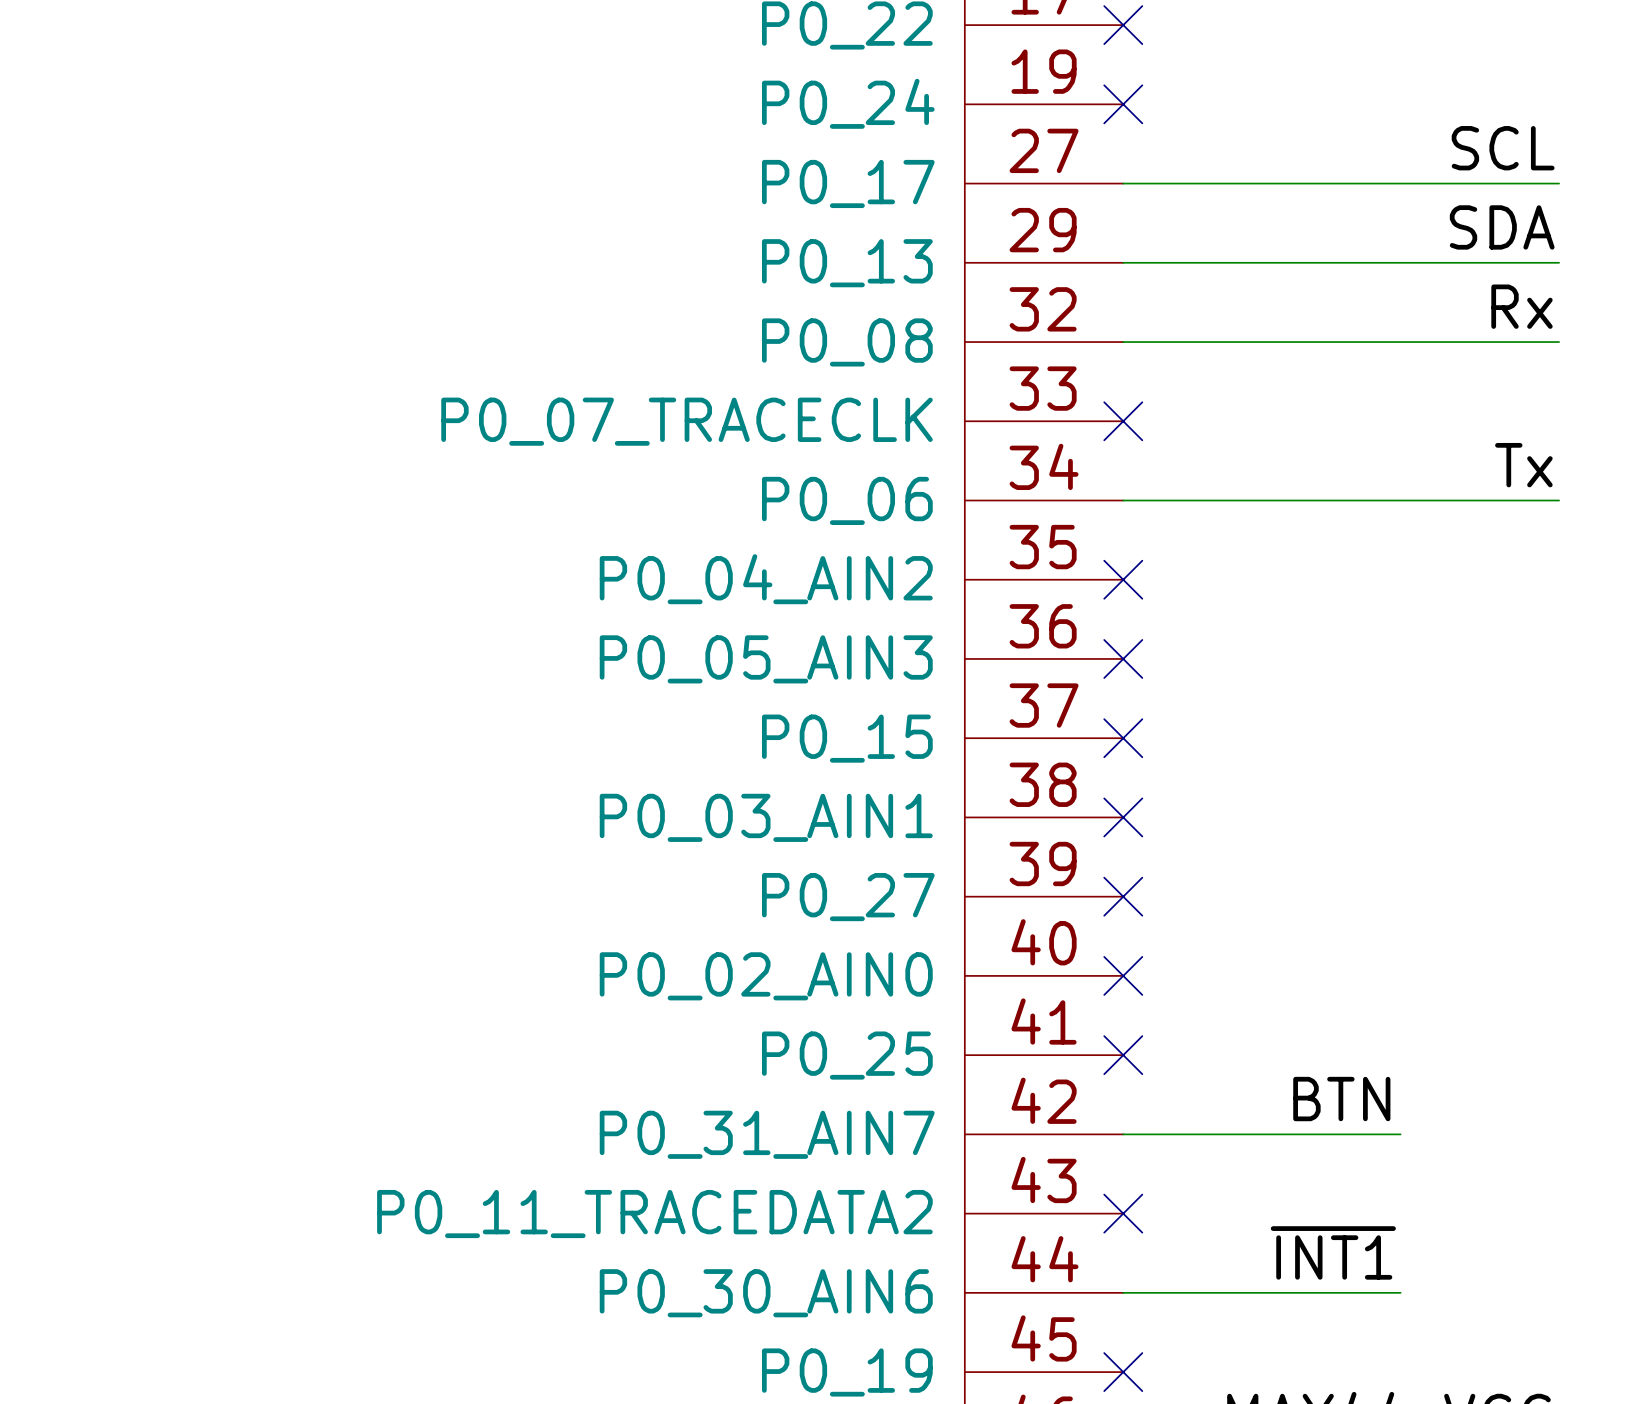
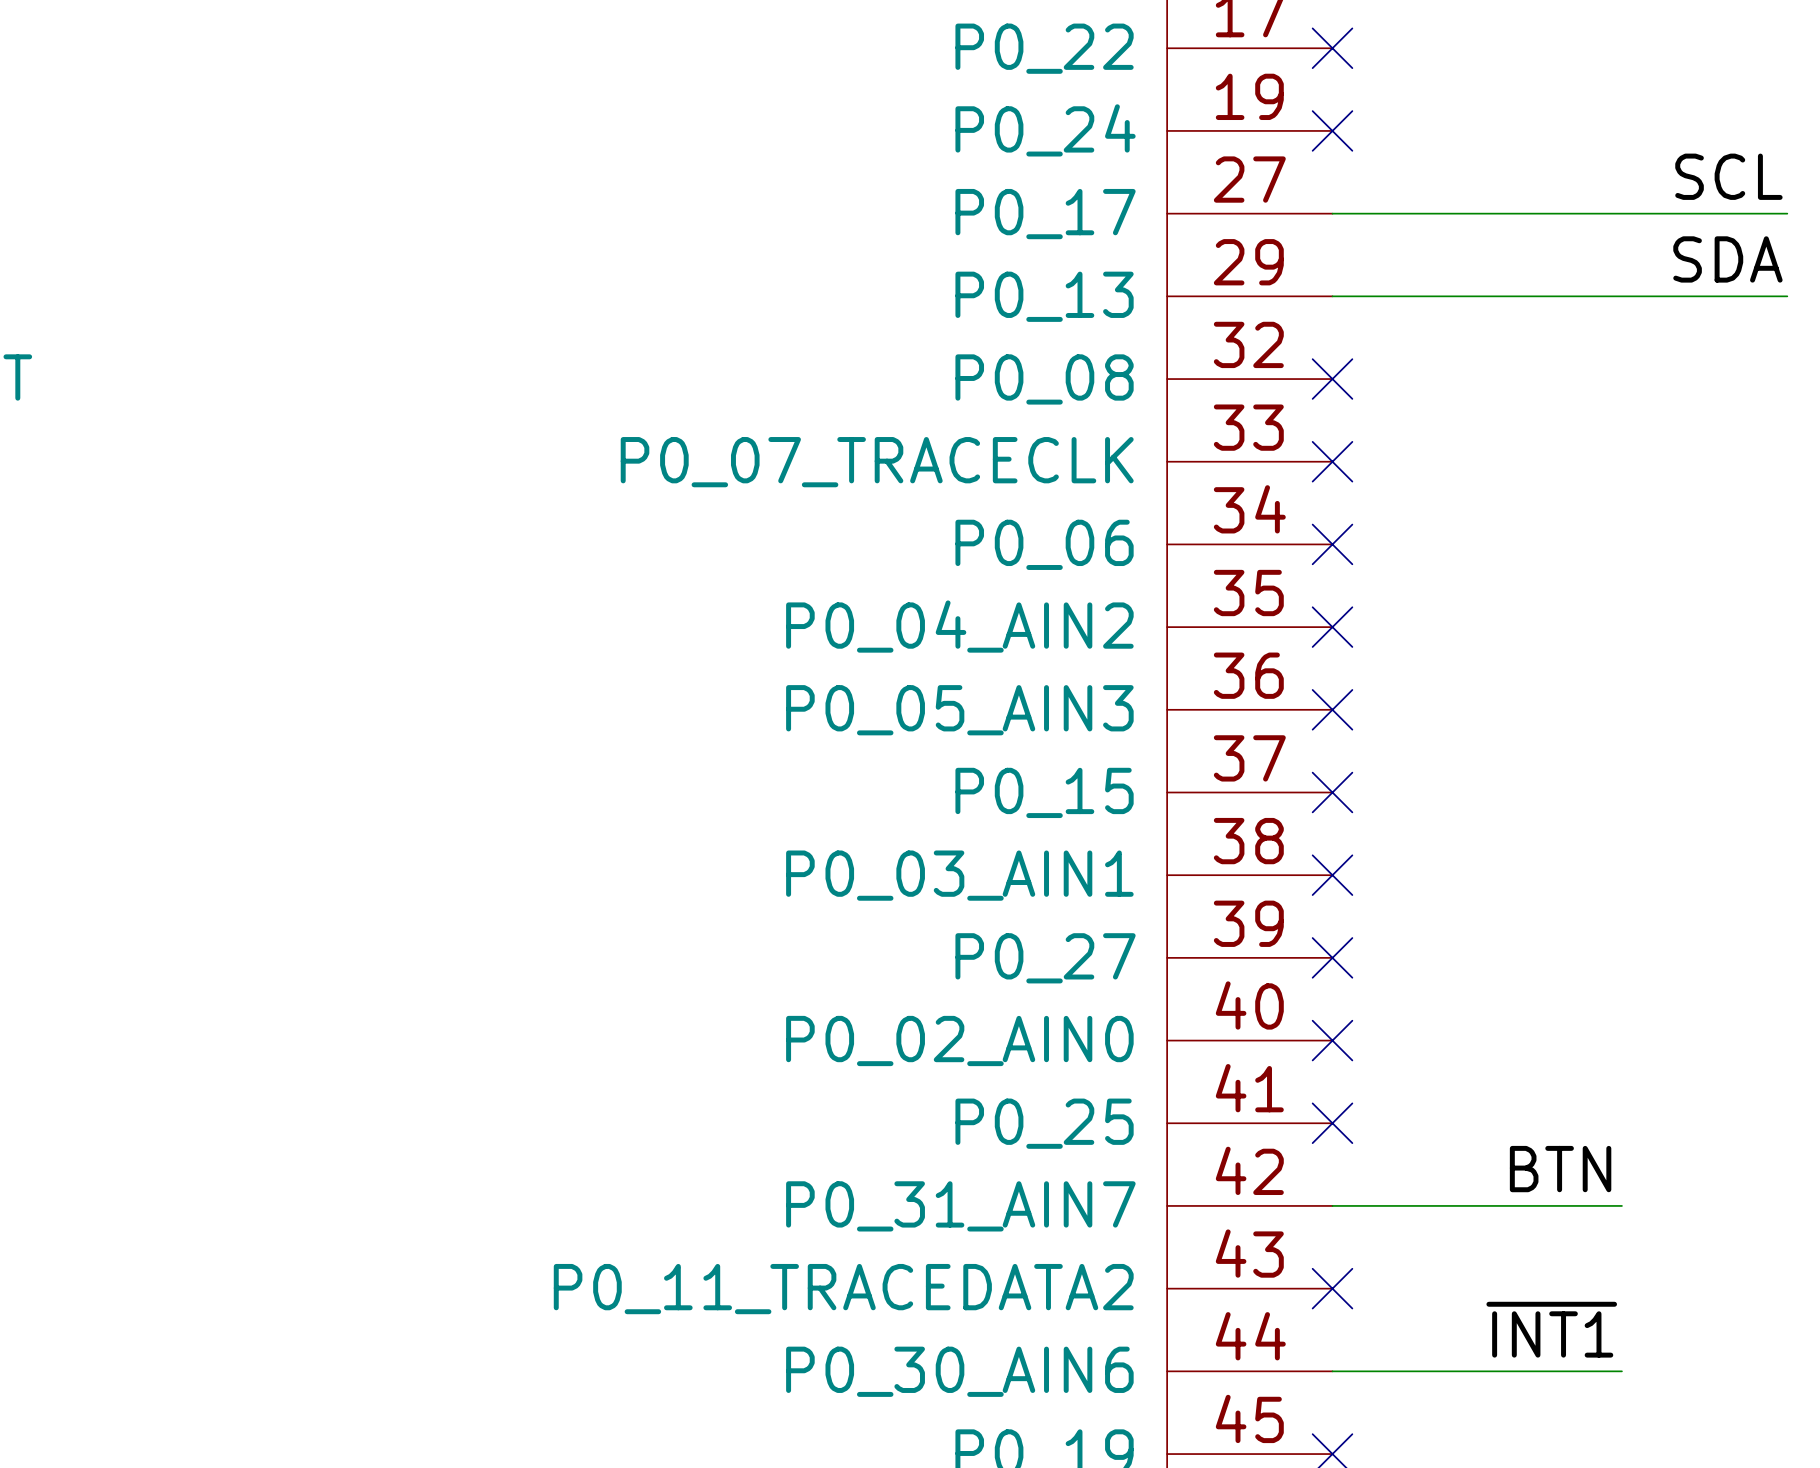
label: Rx (1521, 306) -> none
wire: (1123, 342) (1559, 342) -> none
no-connect mark: none -> (1332, 379)
label: Tx (1523, 465) -> none
wire: (1123, 500) (1559, 500) -> none
no-connect mark: none -> (1332, 544)

